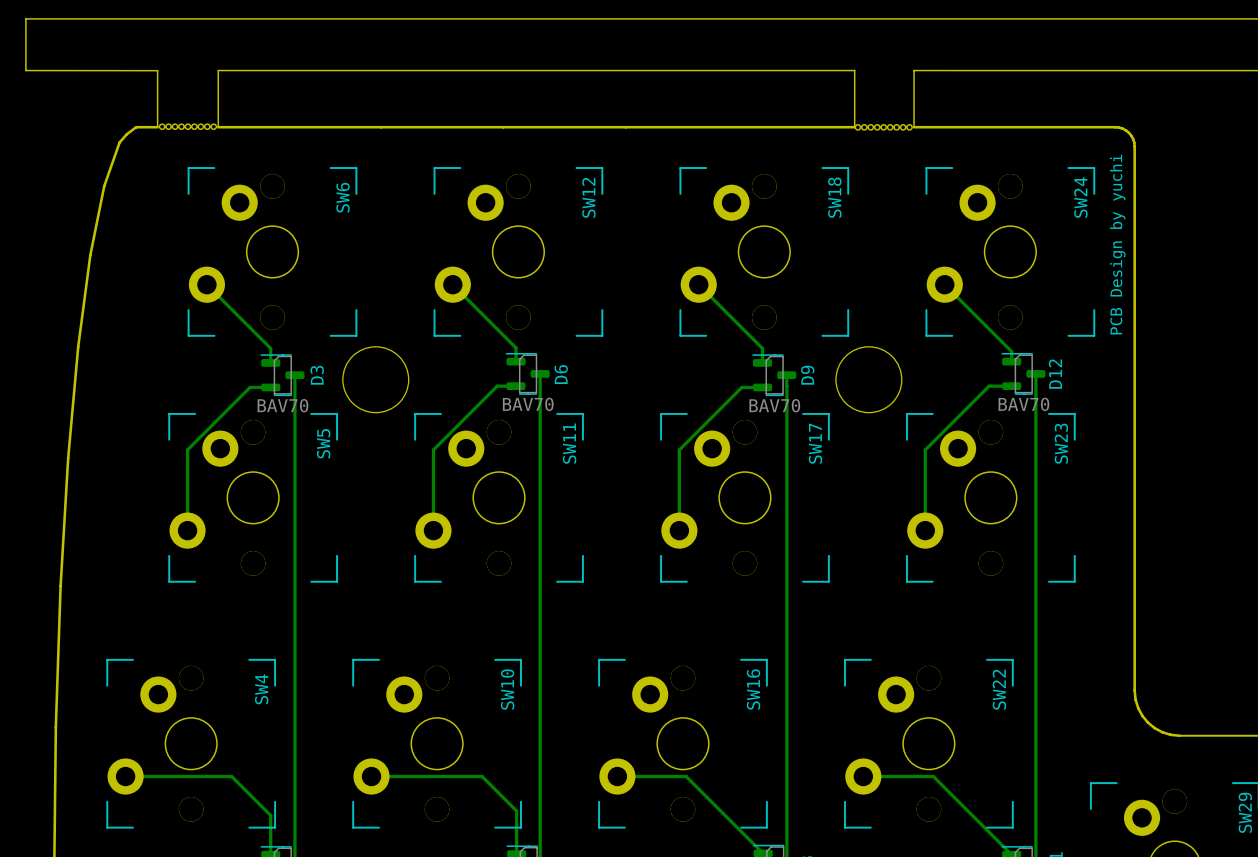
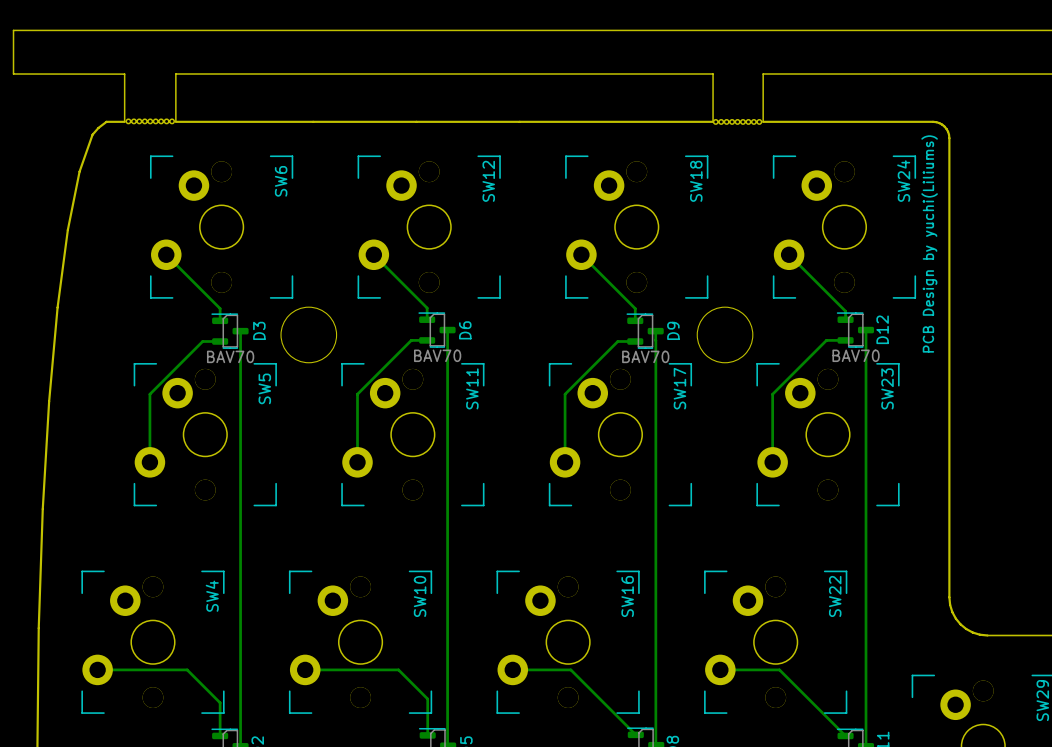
text: PCB Design by yuchi (1117, 244) -> PCB Design by yuchi(Liliums) (929, 243)

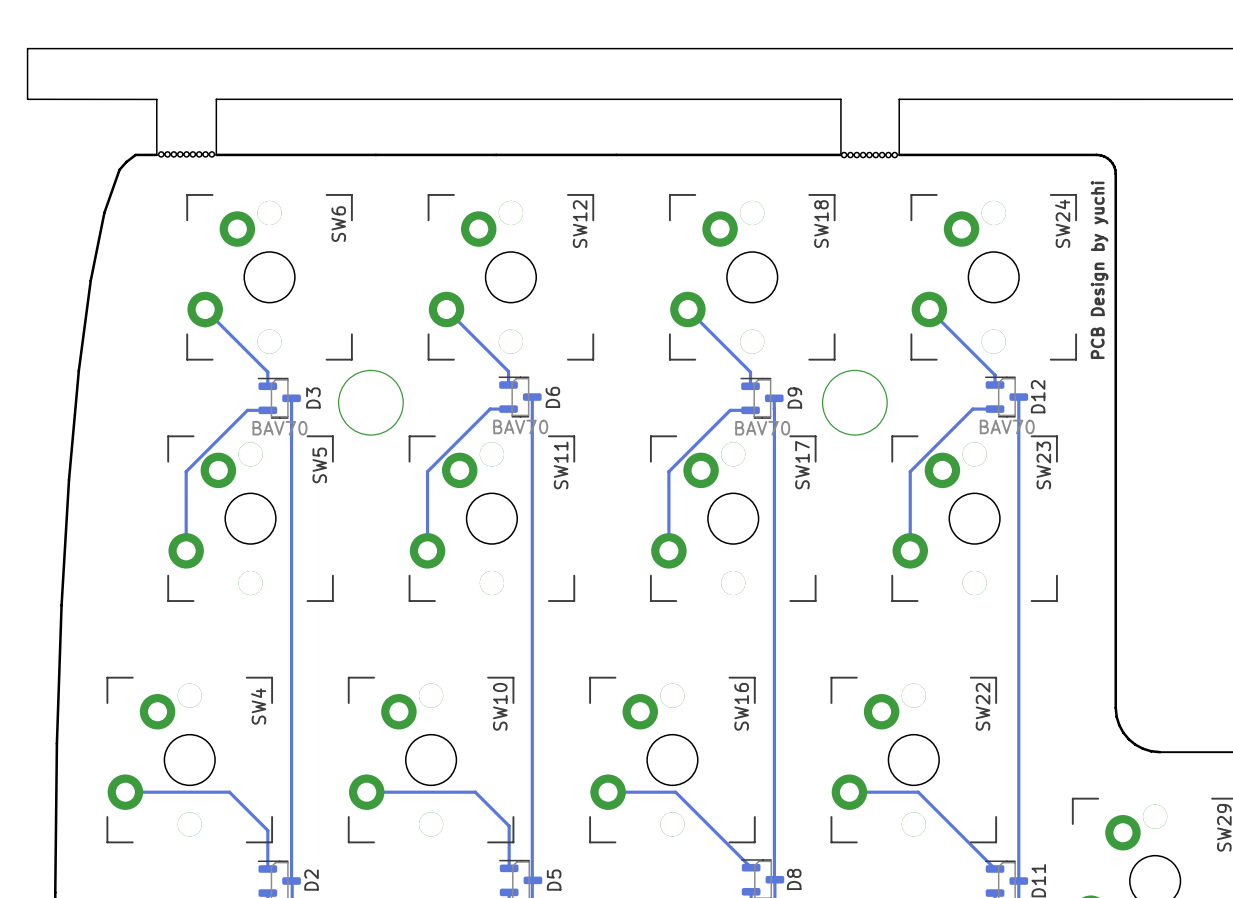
text: PCB Design by yuchi(Liliums) (929, 243) -> PCB Design by yuchi (1099, 270)

